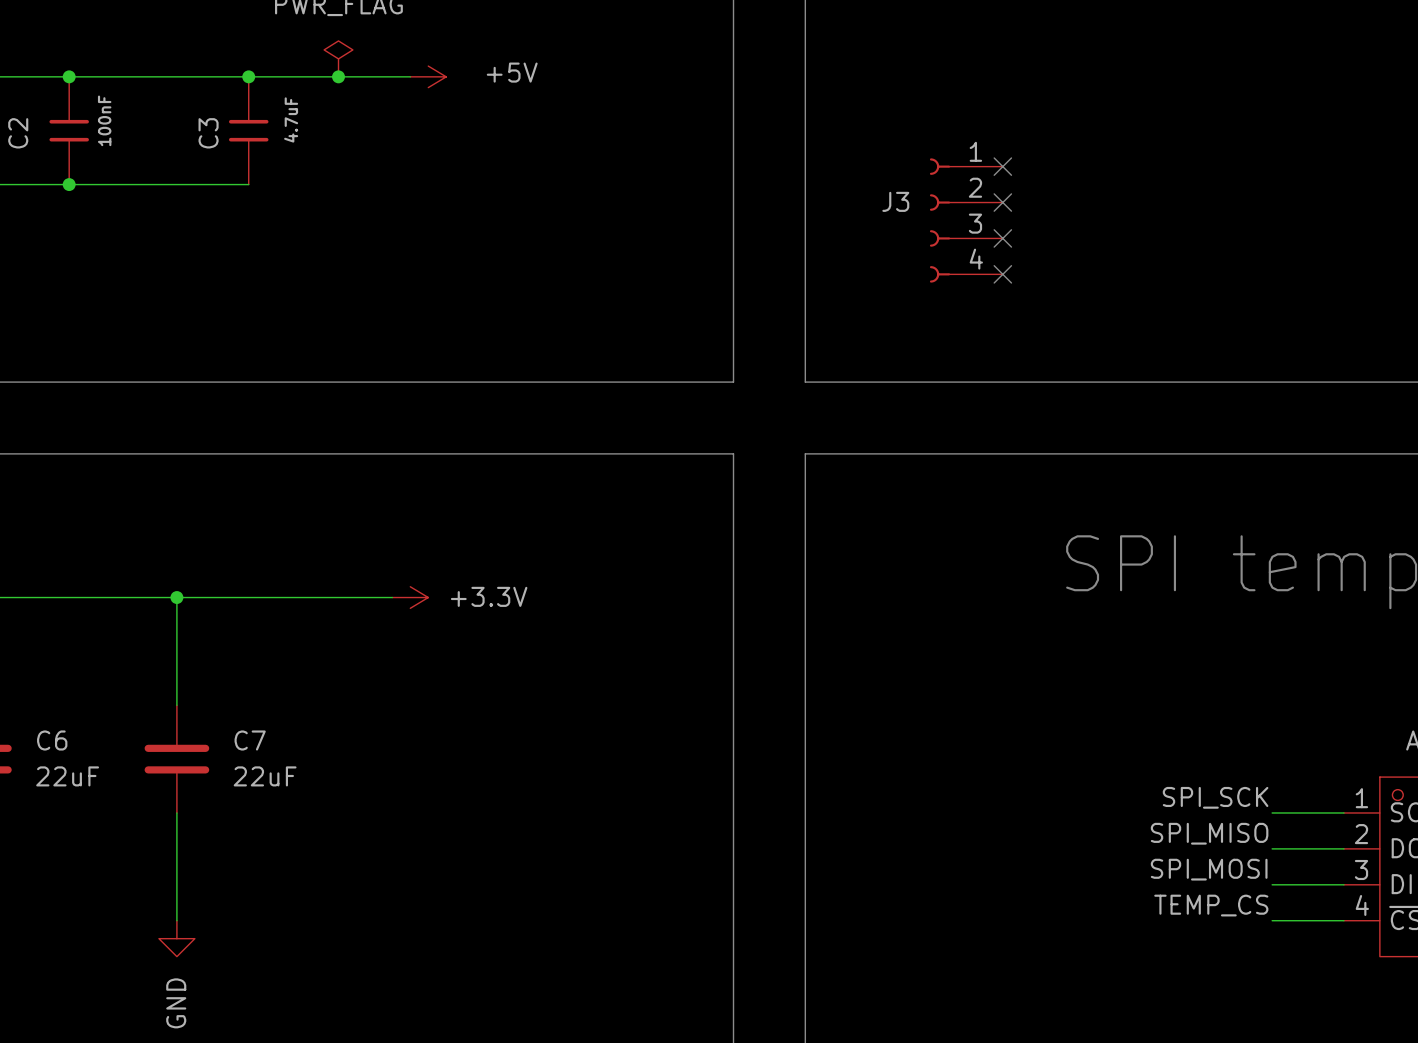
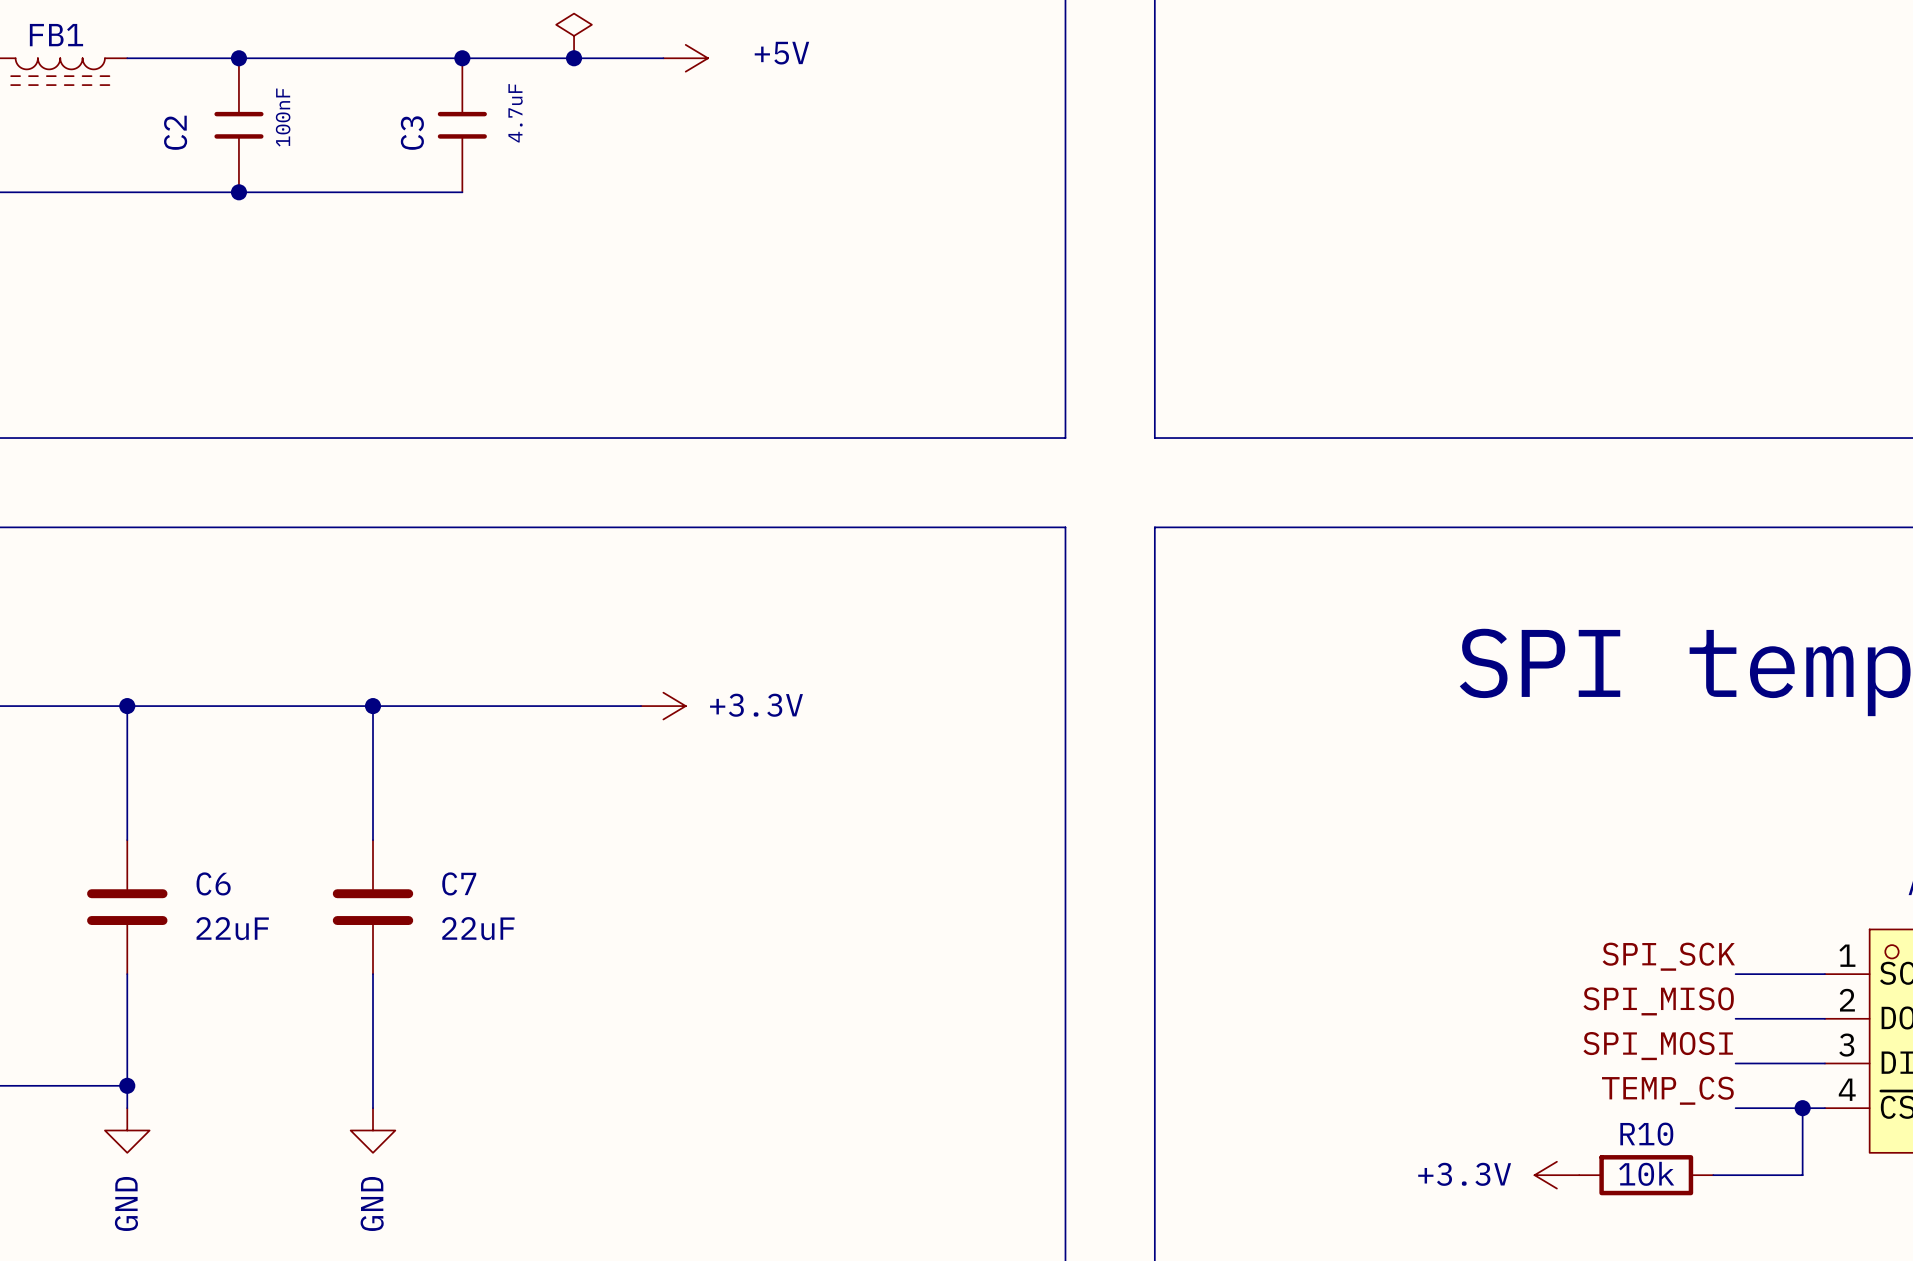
no-connect mark: (1002, 166) -> none
no-connect mark: (1002, 202) -> none
J3: (966, 220) -> none
no-connect mark: (1002, 238) -> none
no-connect mark: (1002, 274) -> none
wire: none -> (1802, 1108) (1802, 1175) (1713, 1175)
junction: none -> (1802, 1108)
power symbol: none -> +3.3V (1556, 1175)
R10: none -> 10k (1646, 1175)

